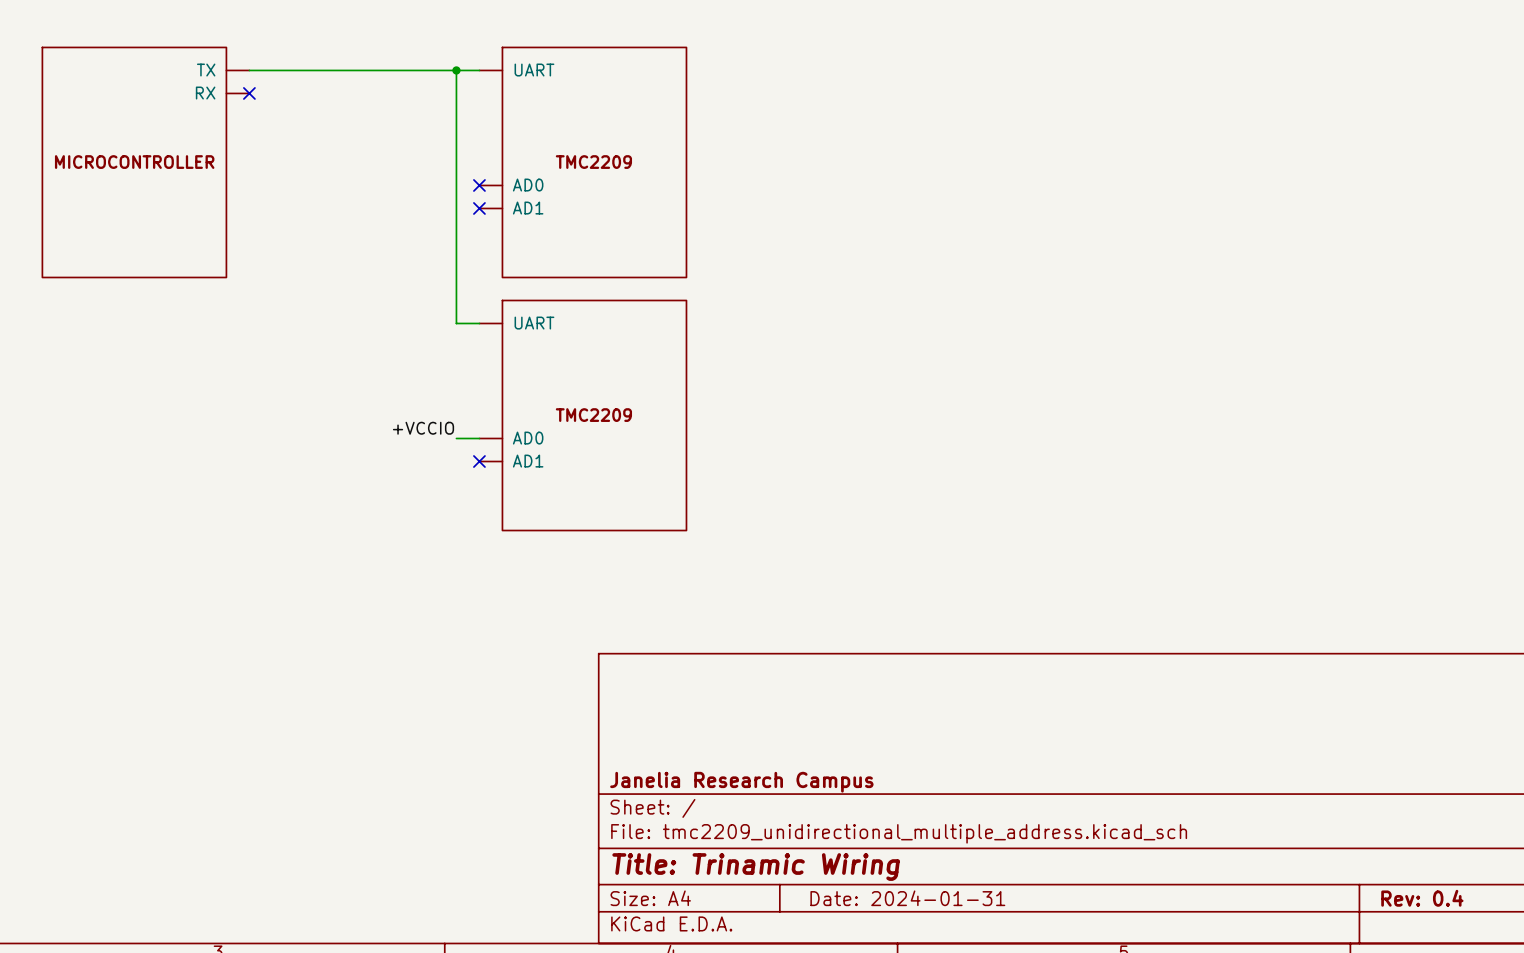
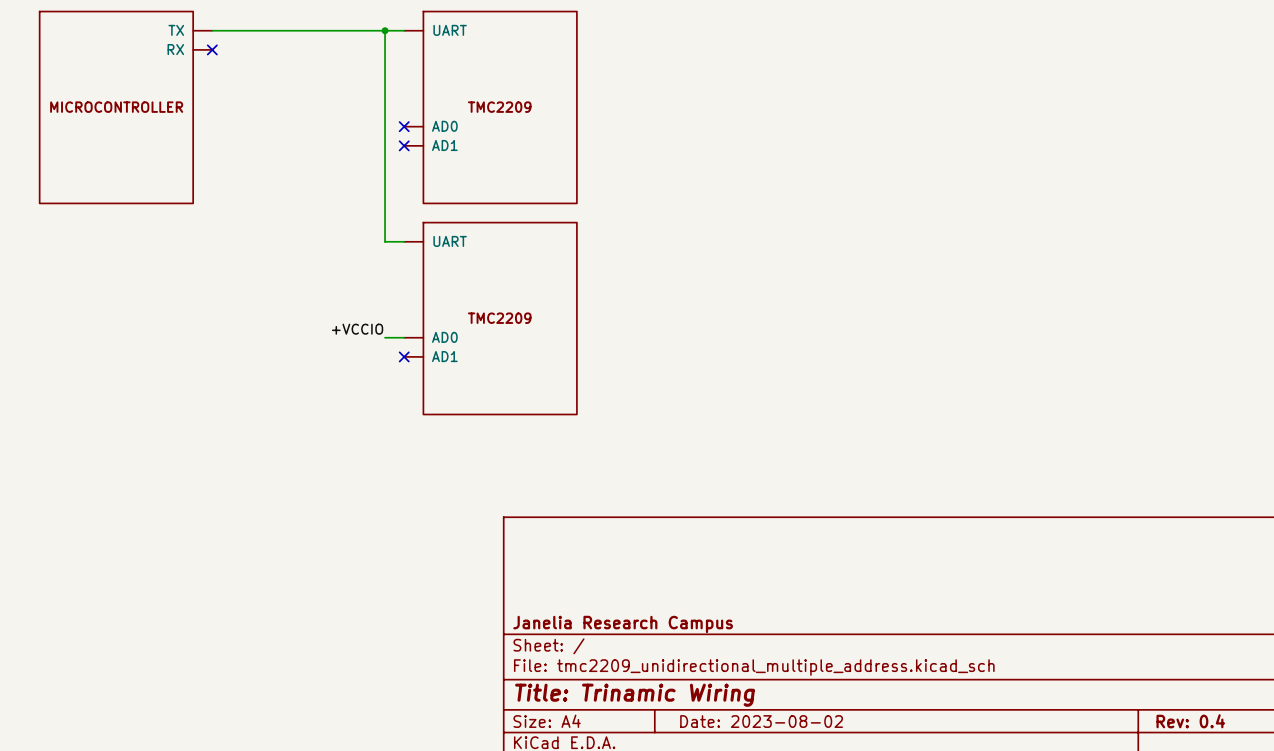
title block: Date: 2024-01-31 (907, 898) -> Date: 2023-08-02 (761, 721)

